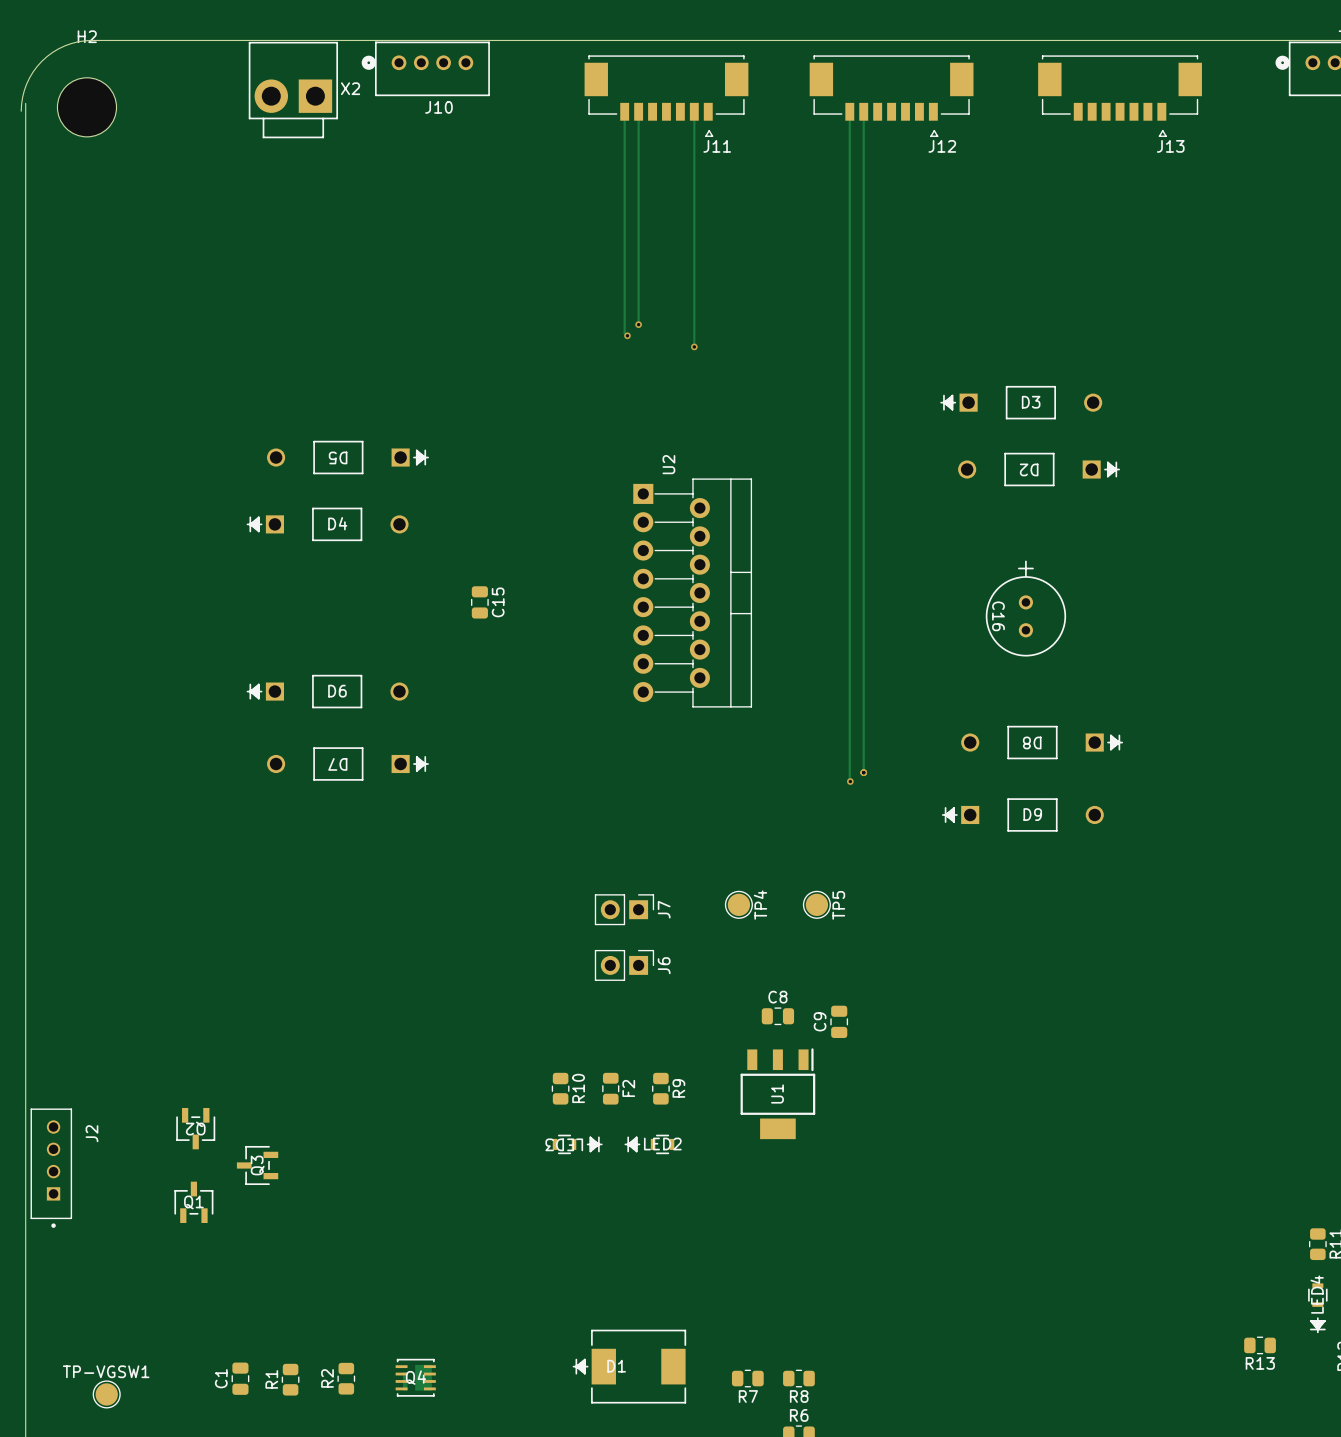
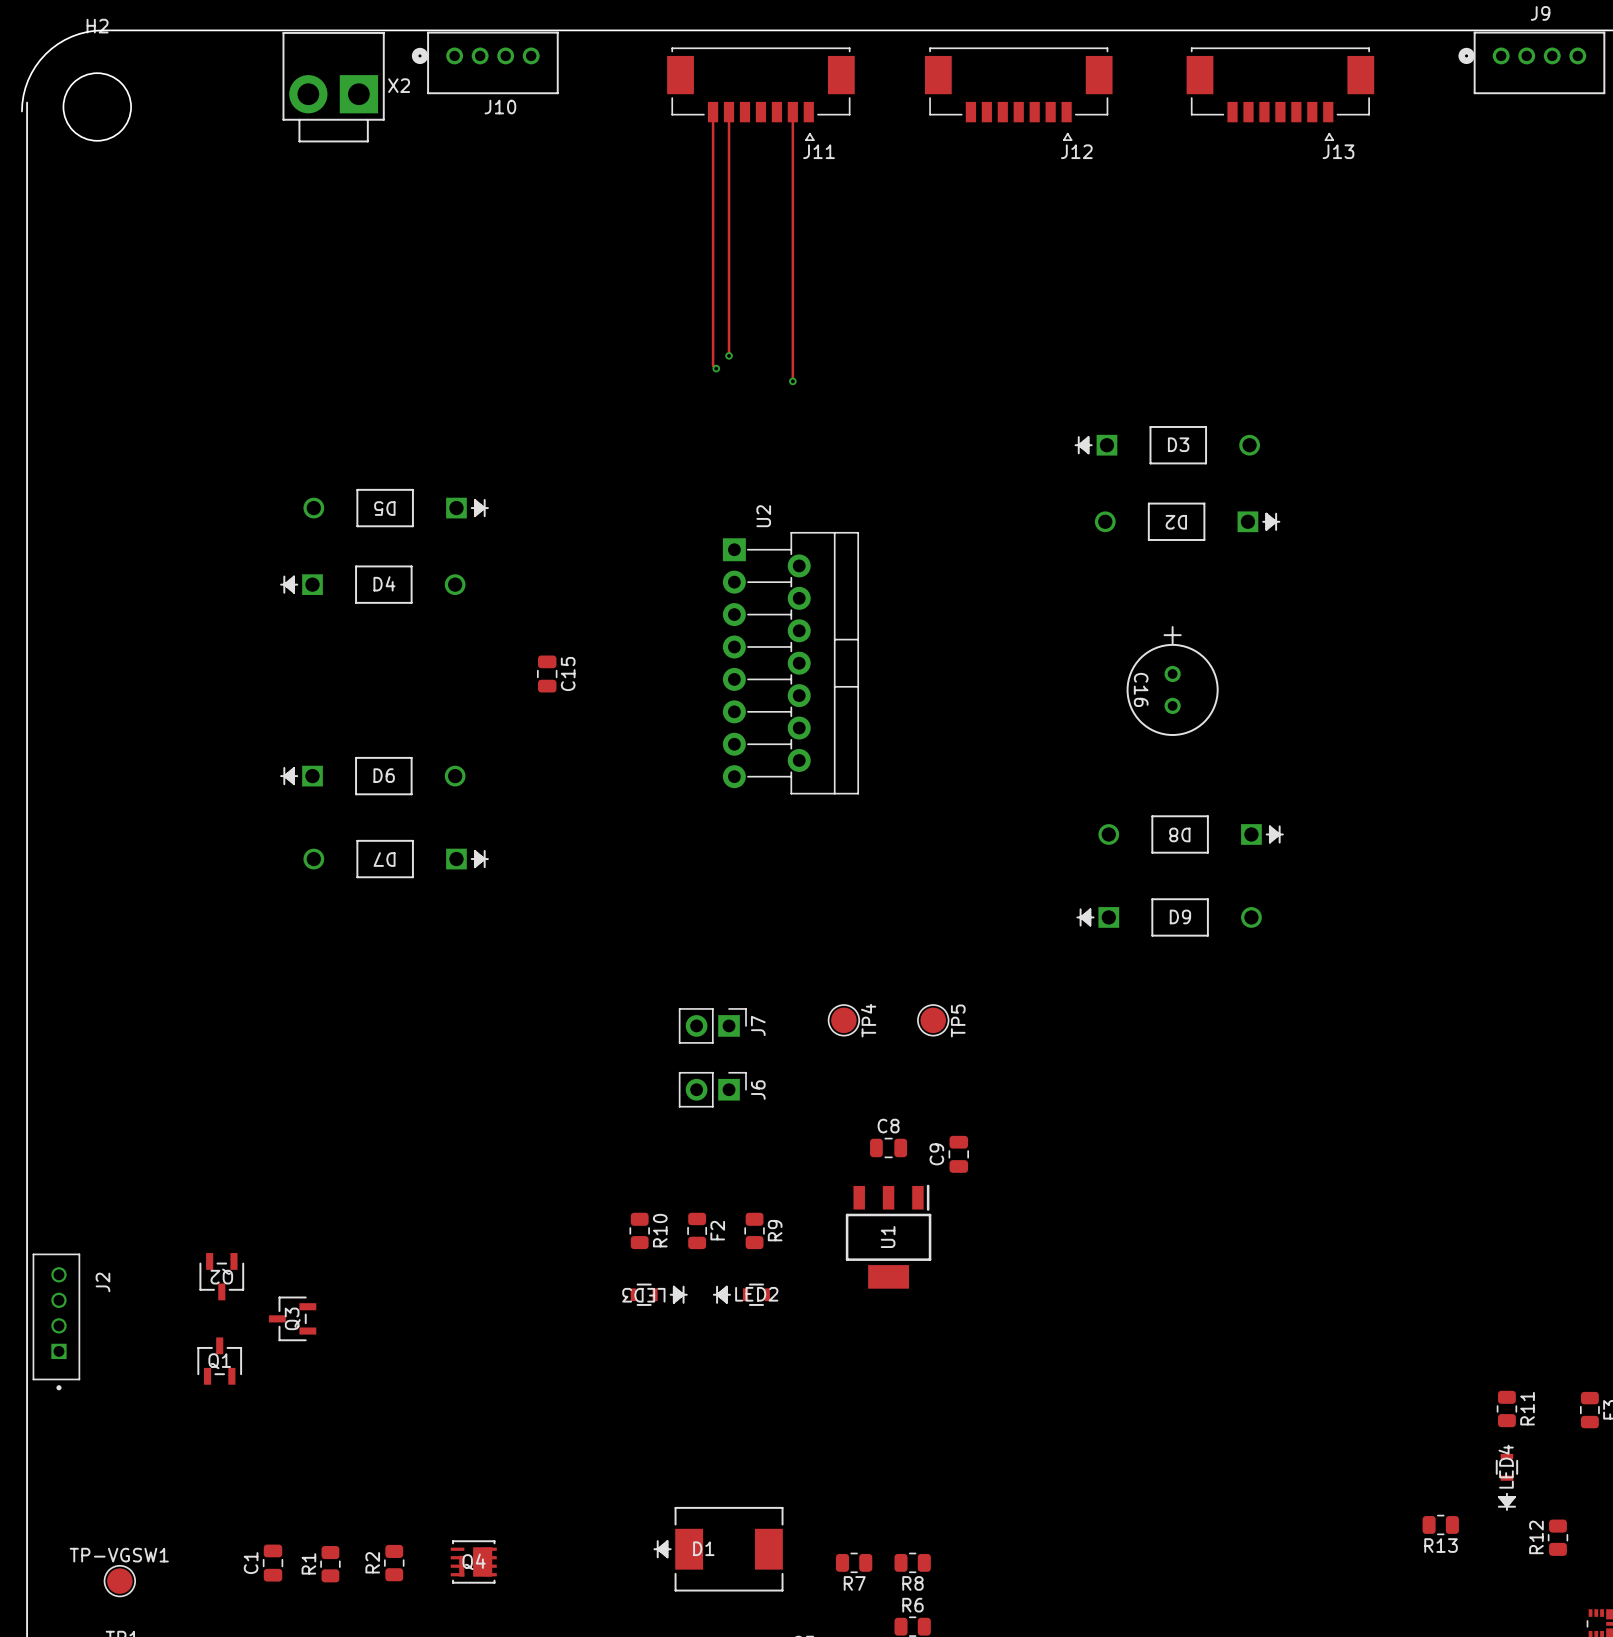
track: (849, 111) (850, 781) -> none
track: (863, 111) (863, 772) -> none
via: (863, 772) -> none
via: (850, 781) -> none

